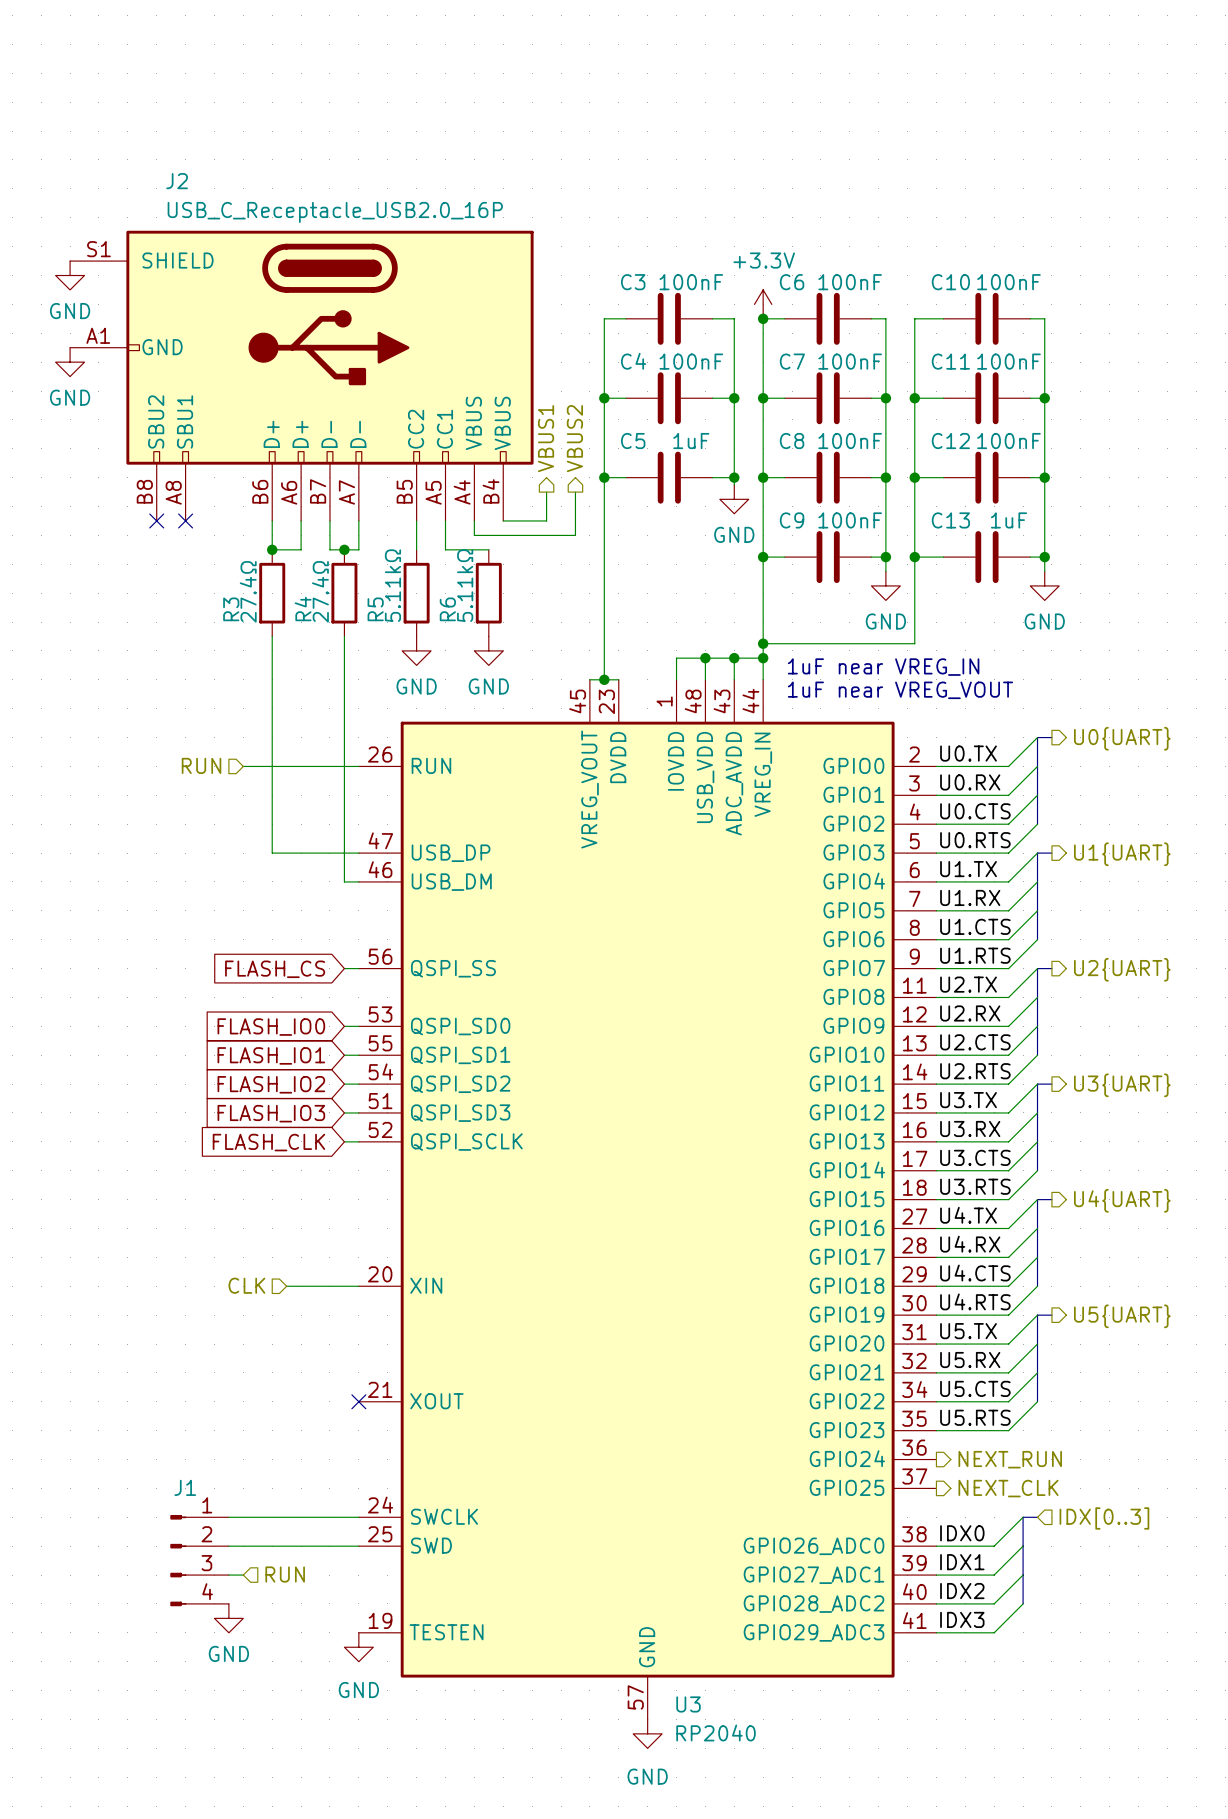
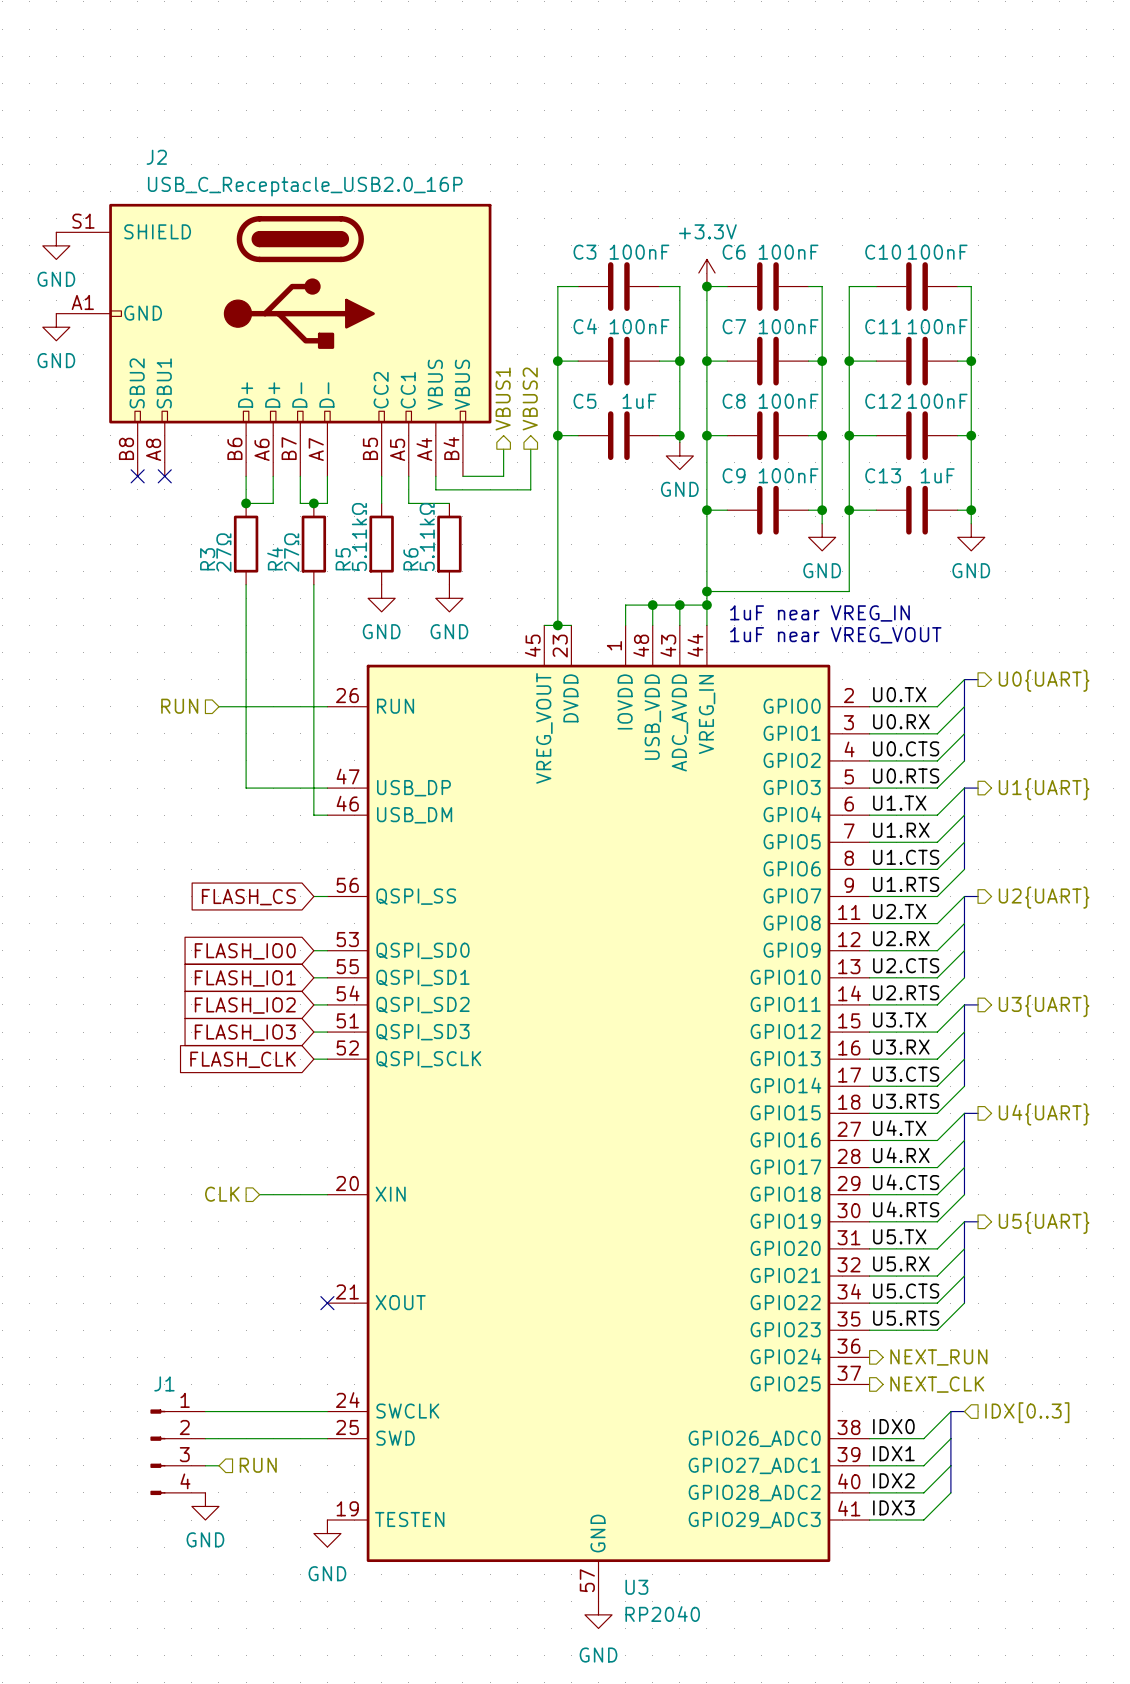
R3 value: 27.4Ω (248, 591) -> 27Ω (223, 552)
R4 value: 27.4Ω (320, 591) -> 27Ω (291, 552)

